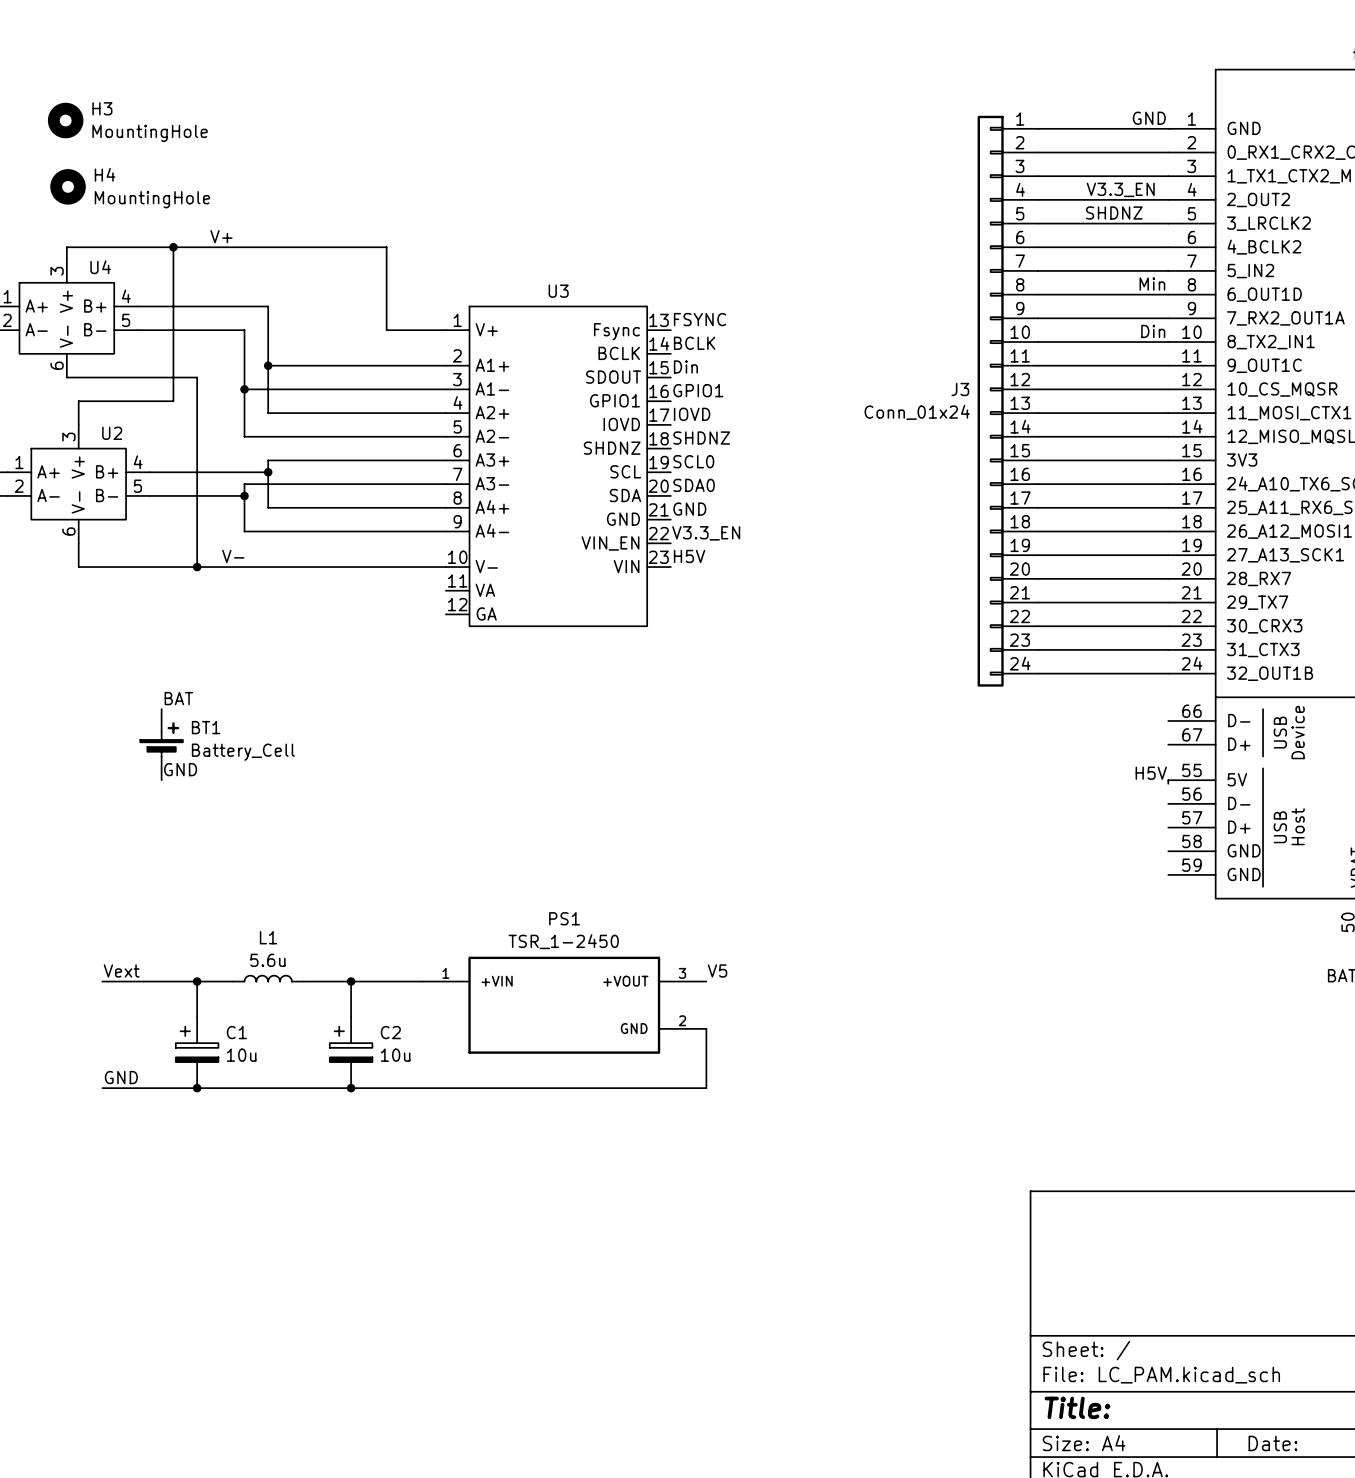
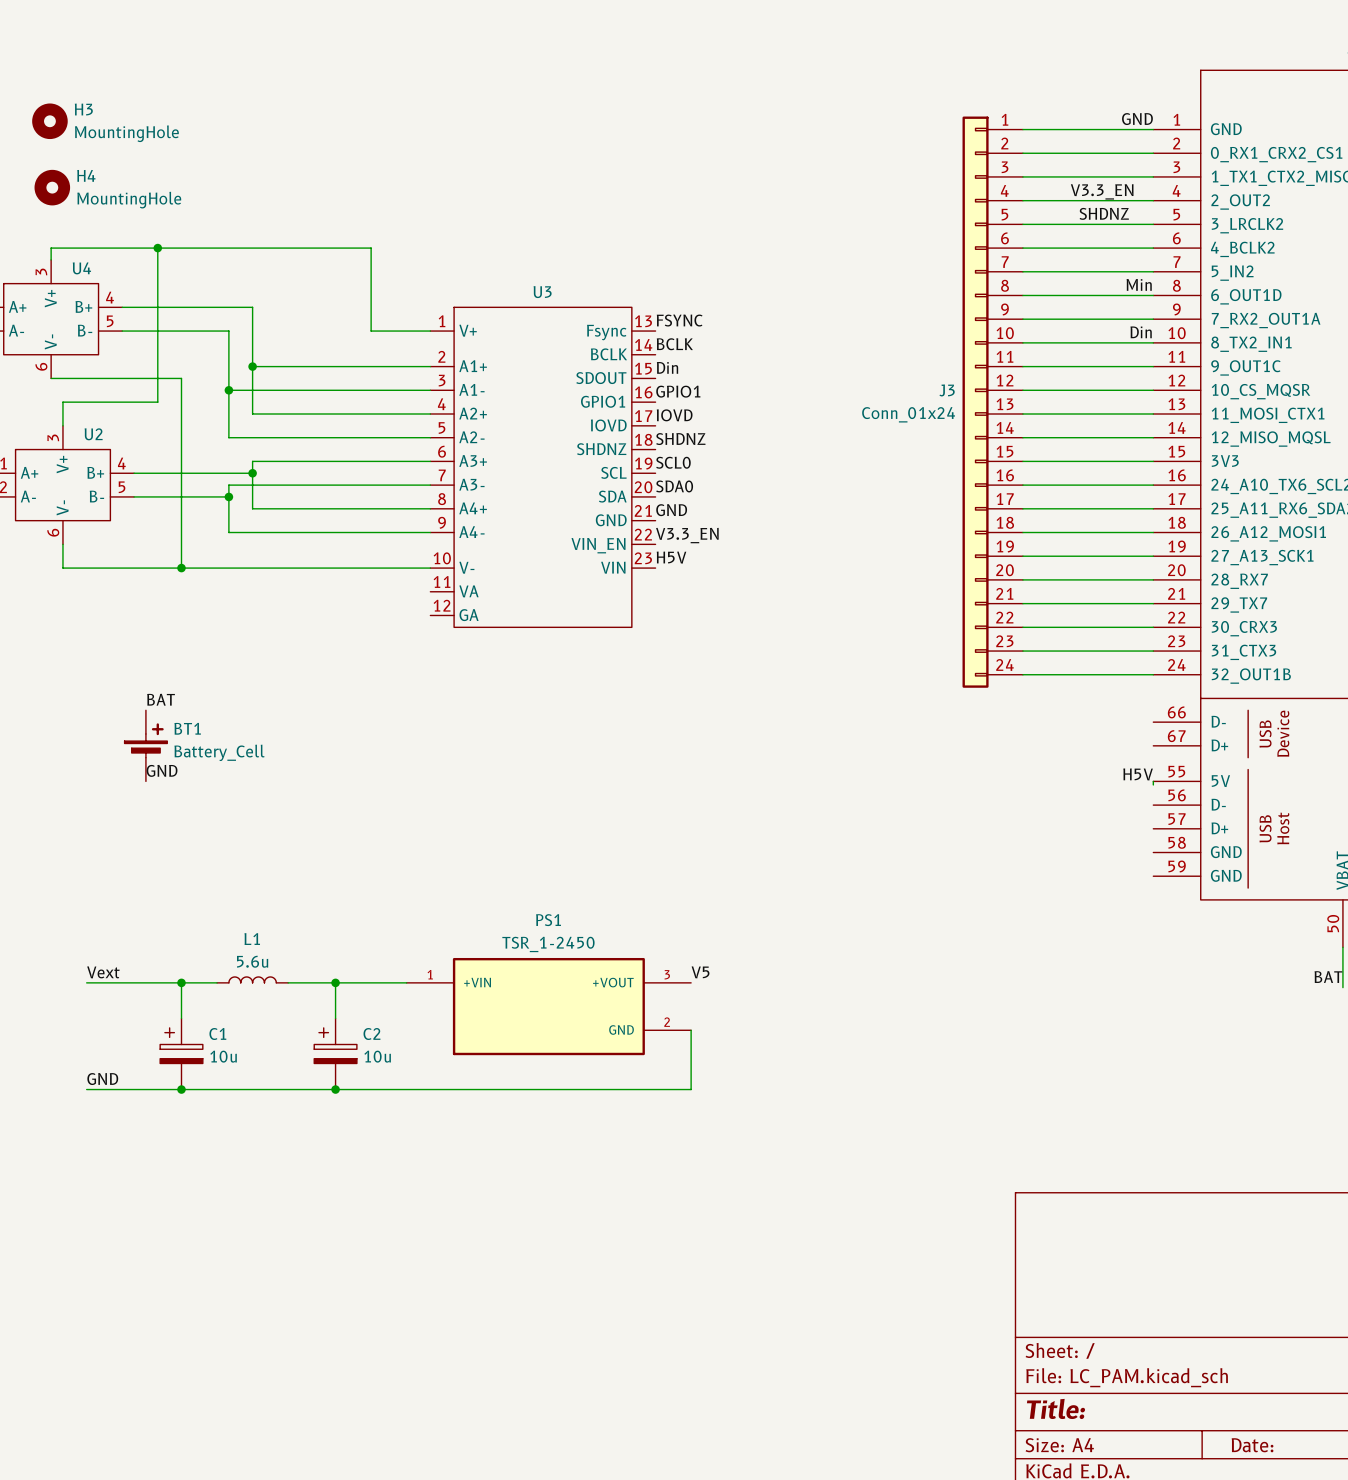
label: V+ (221, 236) -> none
label: V- (233, 556) -> none

